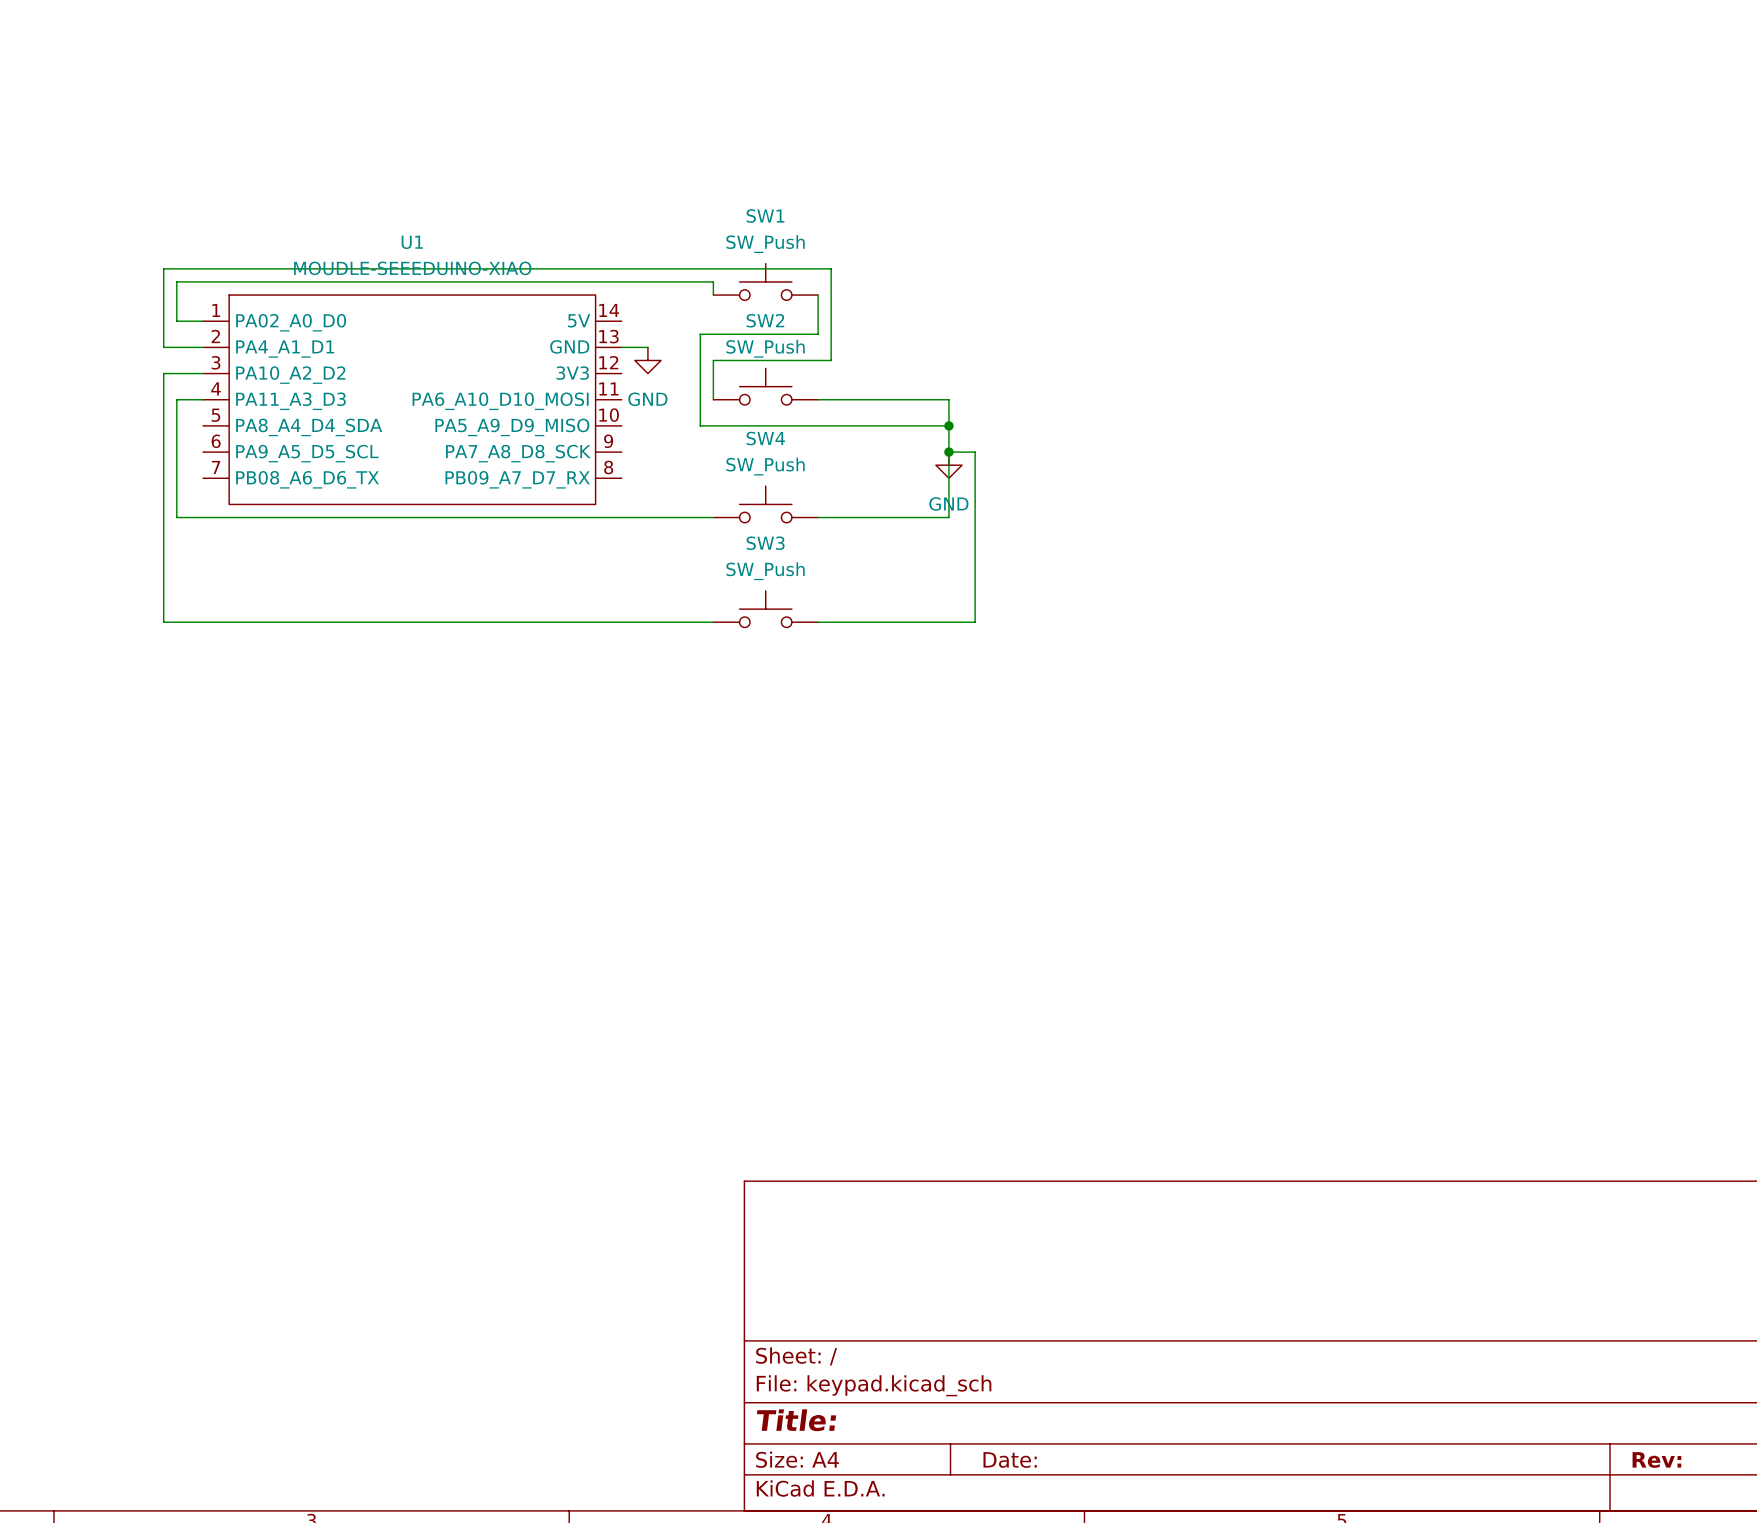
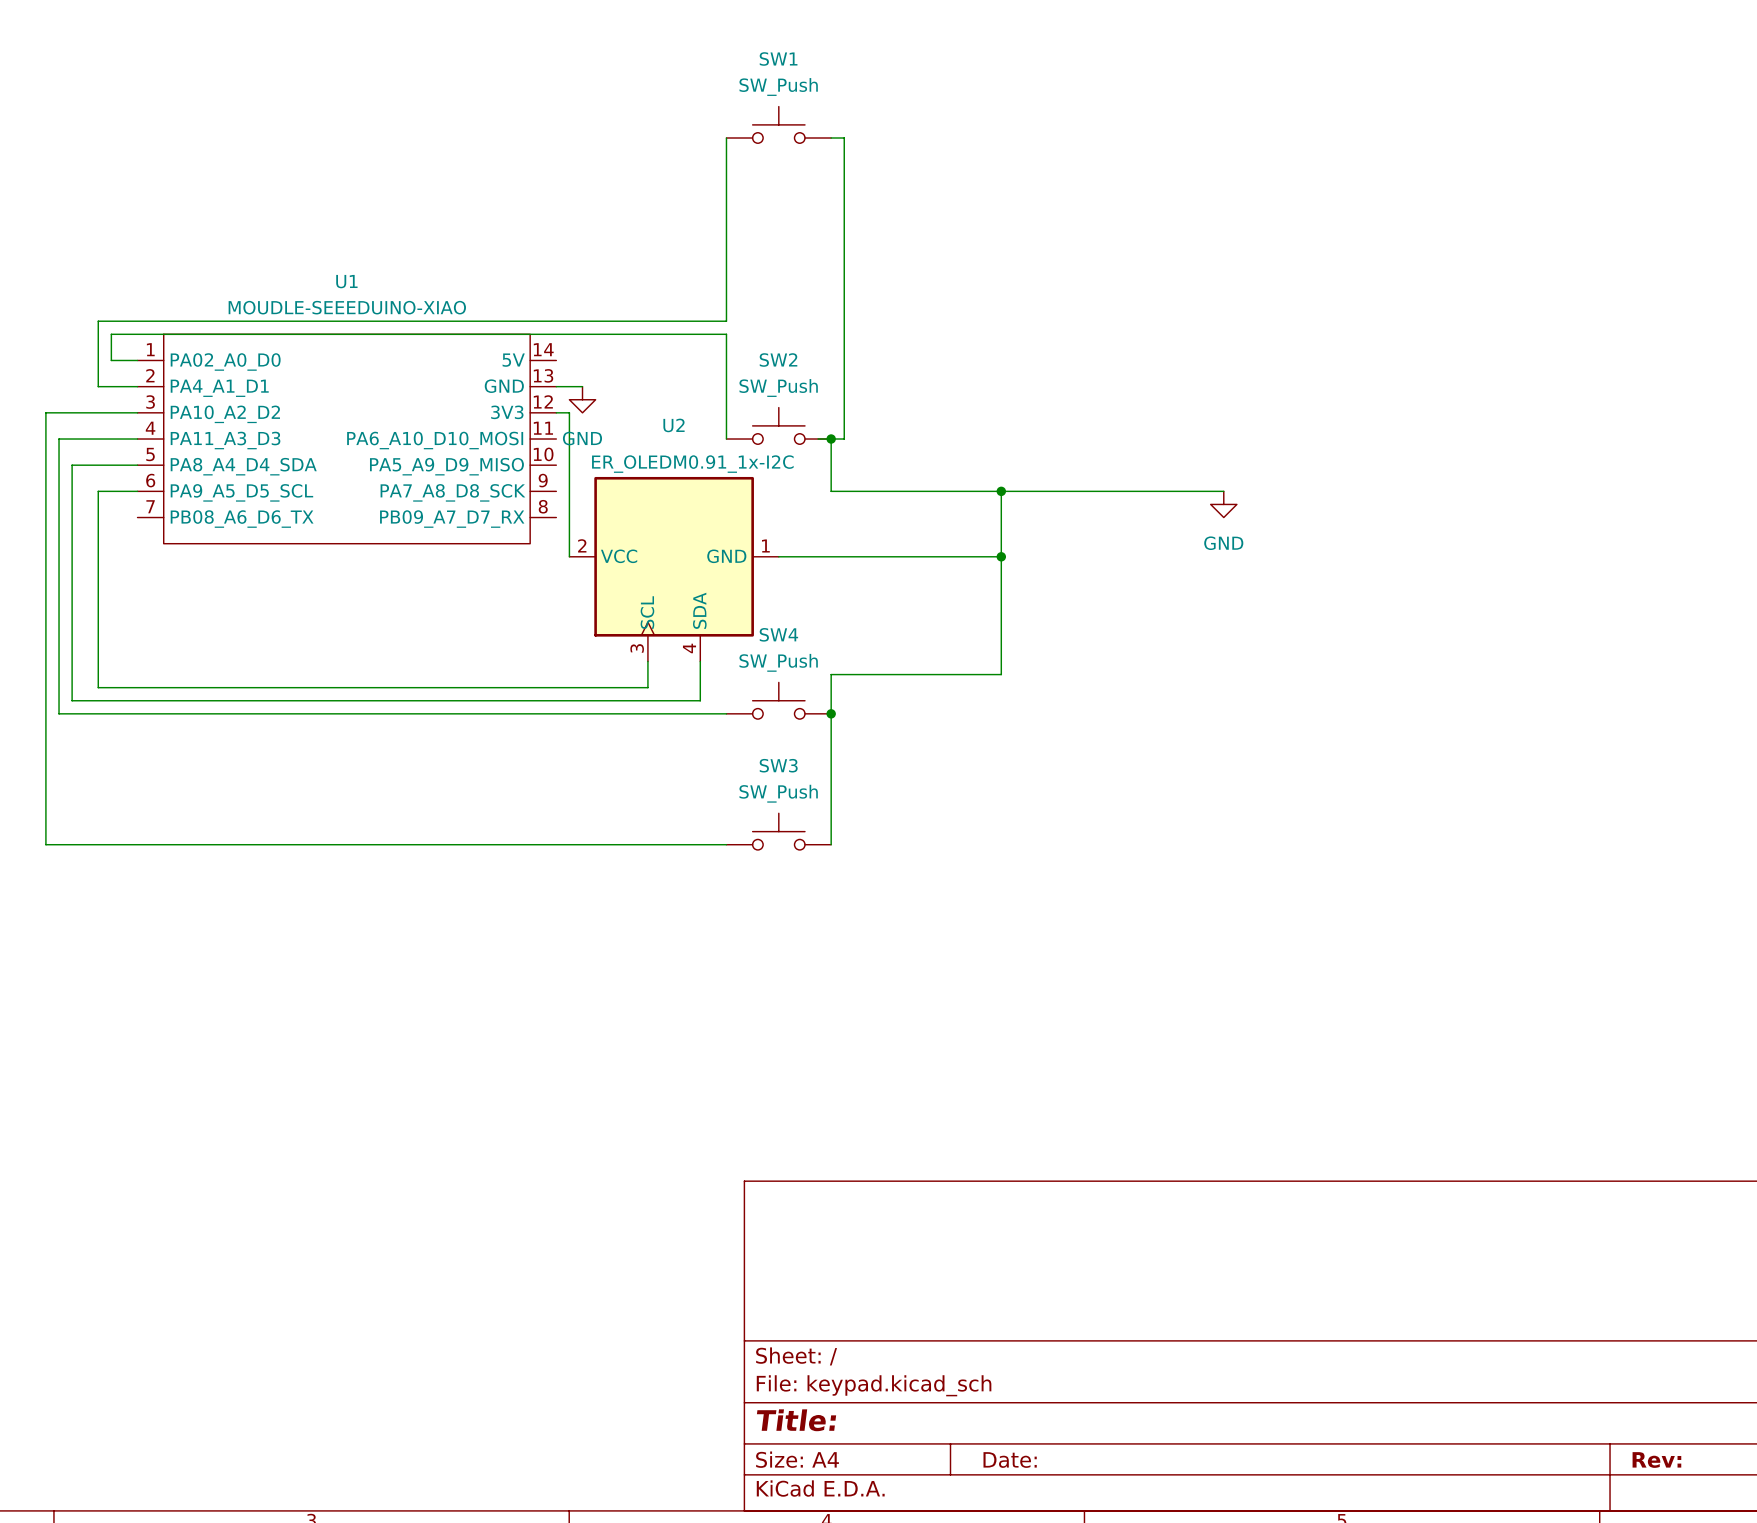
wire: none -> (726, 138) (726, 321) (202, 321)
wire: none -> (831, 138) (844, 138) (844, 439) (818, 439)
SW1 position: (765, 281) -> (778, 124)
wire: (713, 295) (713, 281) (176, 281) (176, 321) -> (137, 386) (98, 386) (98, 321) (176, 321)
wire: (818, 295) (818, 334) (726, 334) -> (726, 439) (726, 334)
wire: (700, 334) (700, 425) (948, 425) -> (700, 334) (111, 334) (111, 360) (137, 360)
wire: (202, 347) (163, 347) (163, 268) (831, 268) (831, 360) (713, 360) (713, 399) -> none
wire: (621, 347) (647, 347) -> (556, 386) (582, 386)
power symbol position: GND (647, 360) -> GND (582, 399)
wire: (202, 373) (163, 373) (163, 622) (713, 622) -> none
SW2 position: (765, 386) -> (778, 425)
wire: (202, 399) (176, 399) (176, 517) (713, 517) -> none
U1 position: (412, 399) -> (346, 439)
wire: (818, 399) (948, 399) (948, 517) (818, 517) -> none
wire: none -> (137, 412) (45, 412) (45, 844) (726, 844)
wire: none -> (556, 412) (569, 412) (569, 556)
junction: (948, 425) -> none
wire: none -> (137, 439) (59, 439) (59, 713) (726, 713)
wire: none -> (831, 439) (831, 491) (1223, 491)
junction: none -> (831, 439)
wire: (948, 452) (975, 452) (975, 622) (818, 622) -> none
junction: (948, 452) -> none
wire: none -> (137, 465) (72, 465) (72, 700) (700, 700) (700, 661)
power symbol: GND (948, 465) -> none
wire: none -> (137, 491) (98, 491) (98, 687) (647, 687) (647, 661)
wire: none -> (1001, 491) (1001, 674) (831, 674) (831, 844)
junction: none -> (1001, 491)
SW4 position: (765, 504) -> (778, 700)
power symbol: none -> GND (1223, 504)
wire: none -> (778, 556) (1001, 556)
junction: none -> (1001, 556)
U2: none -> ER_OLEDM0.91_1x-I2C (674, 569)
SW3 position: (765, 609) -> (778, 831)
junction: none -> (831, 713)

